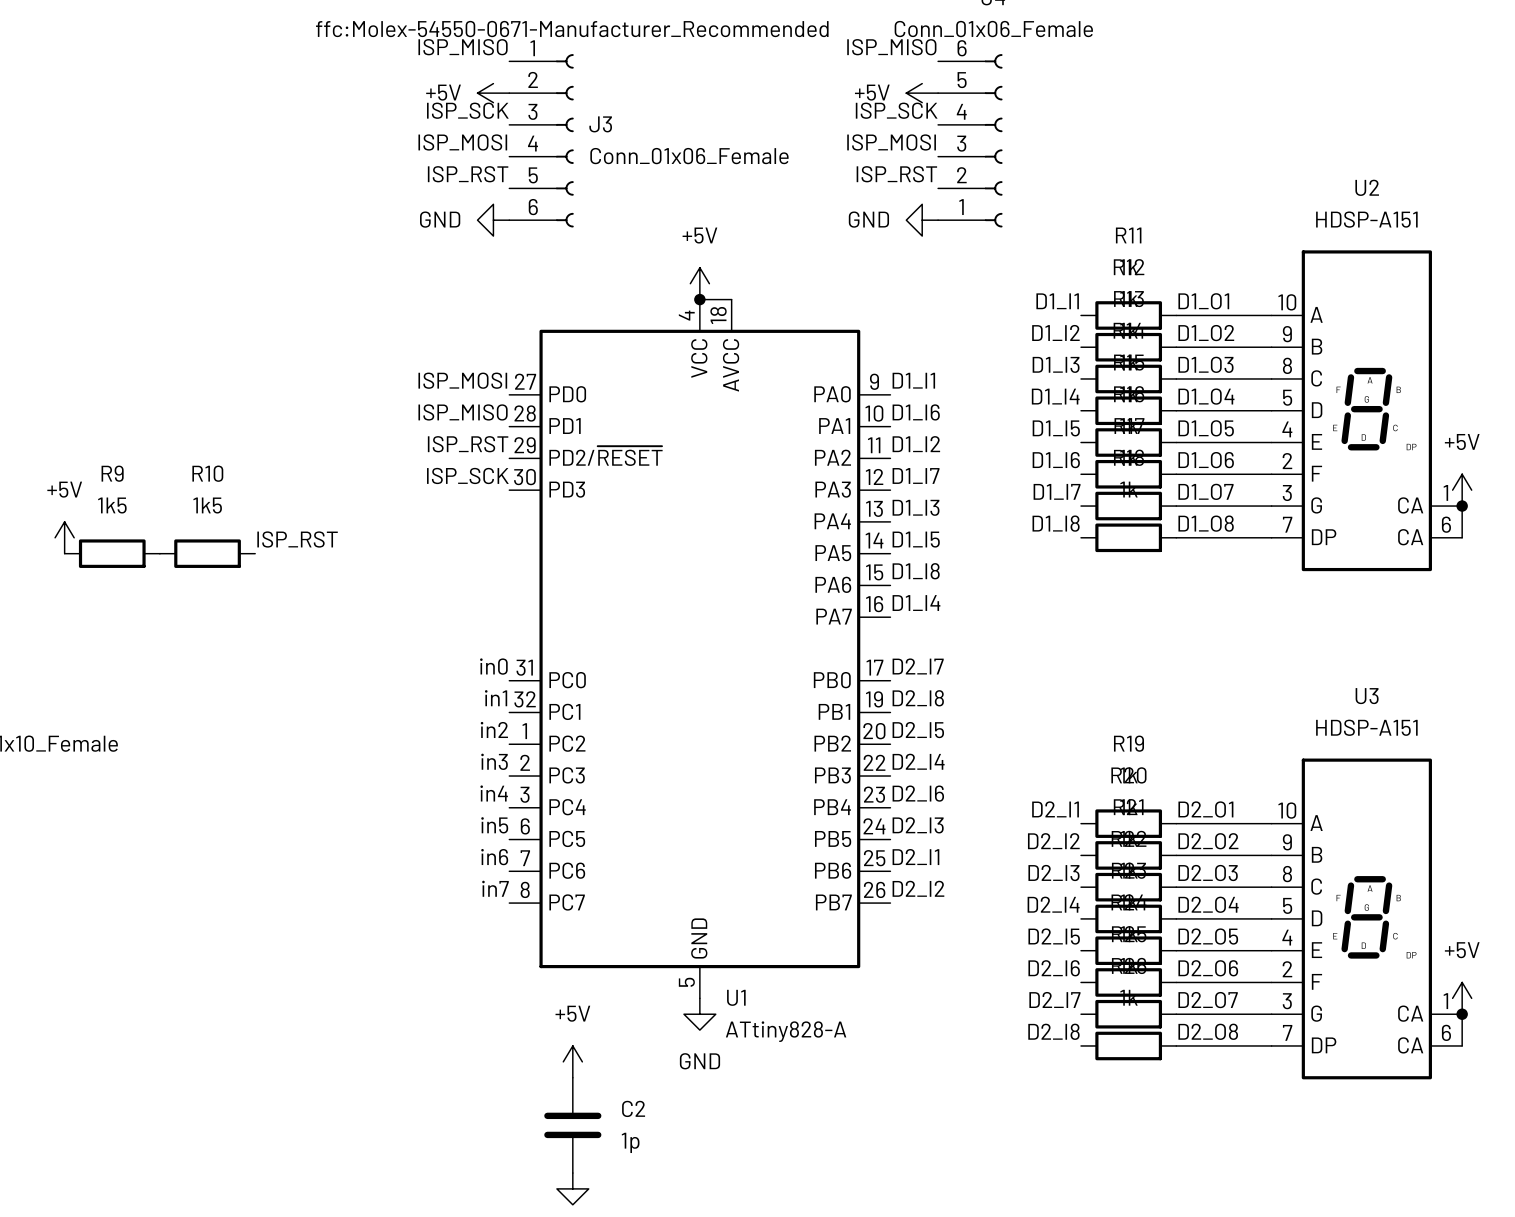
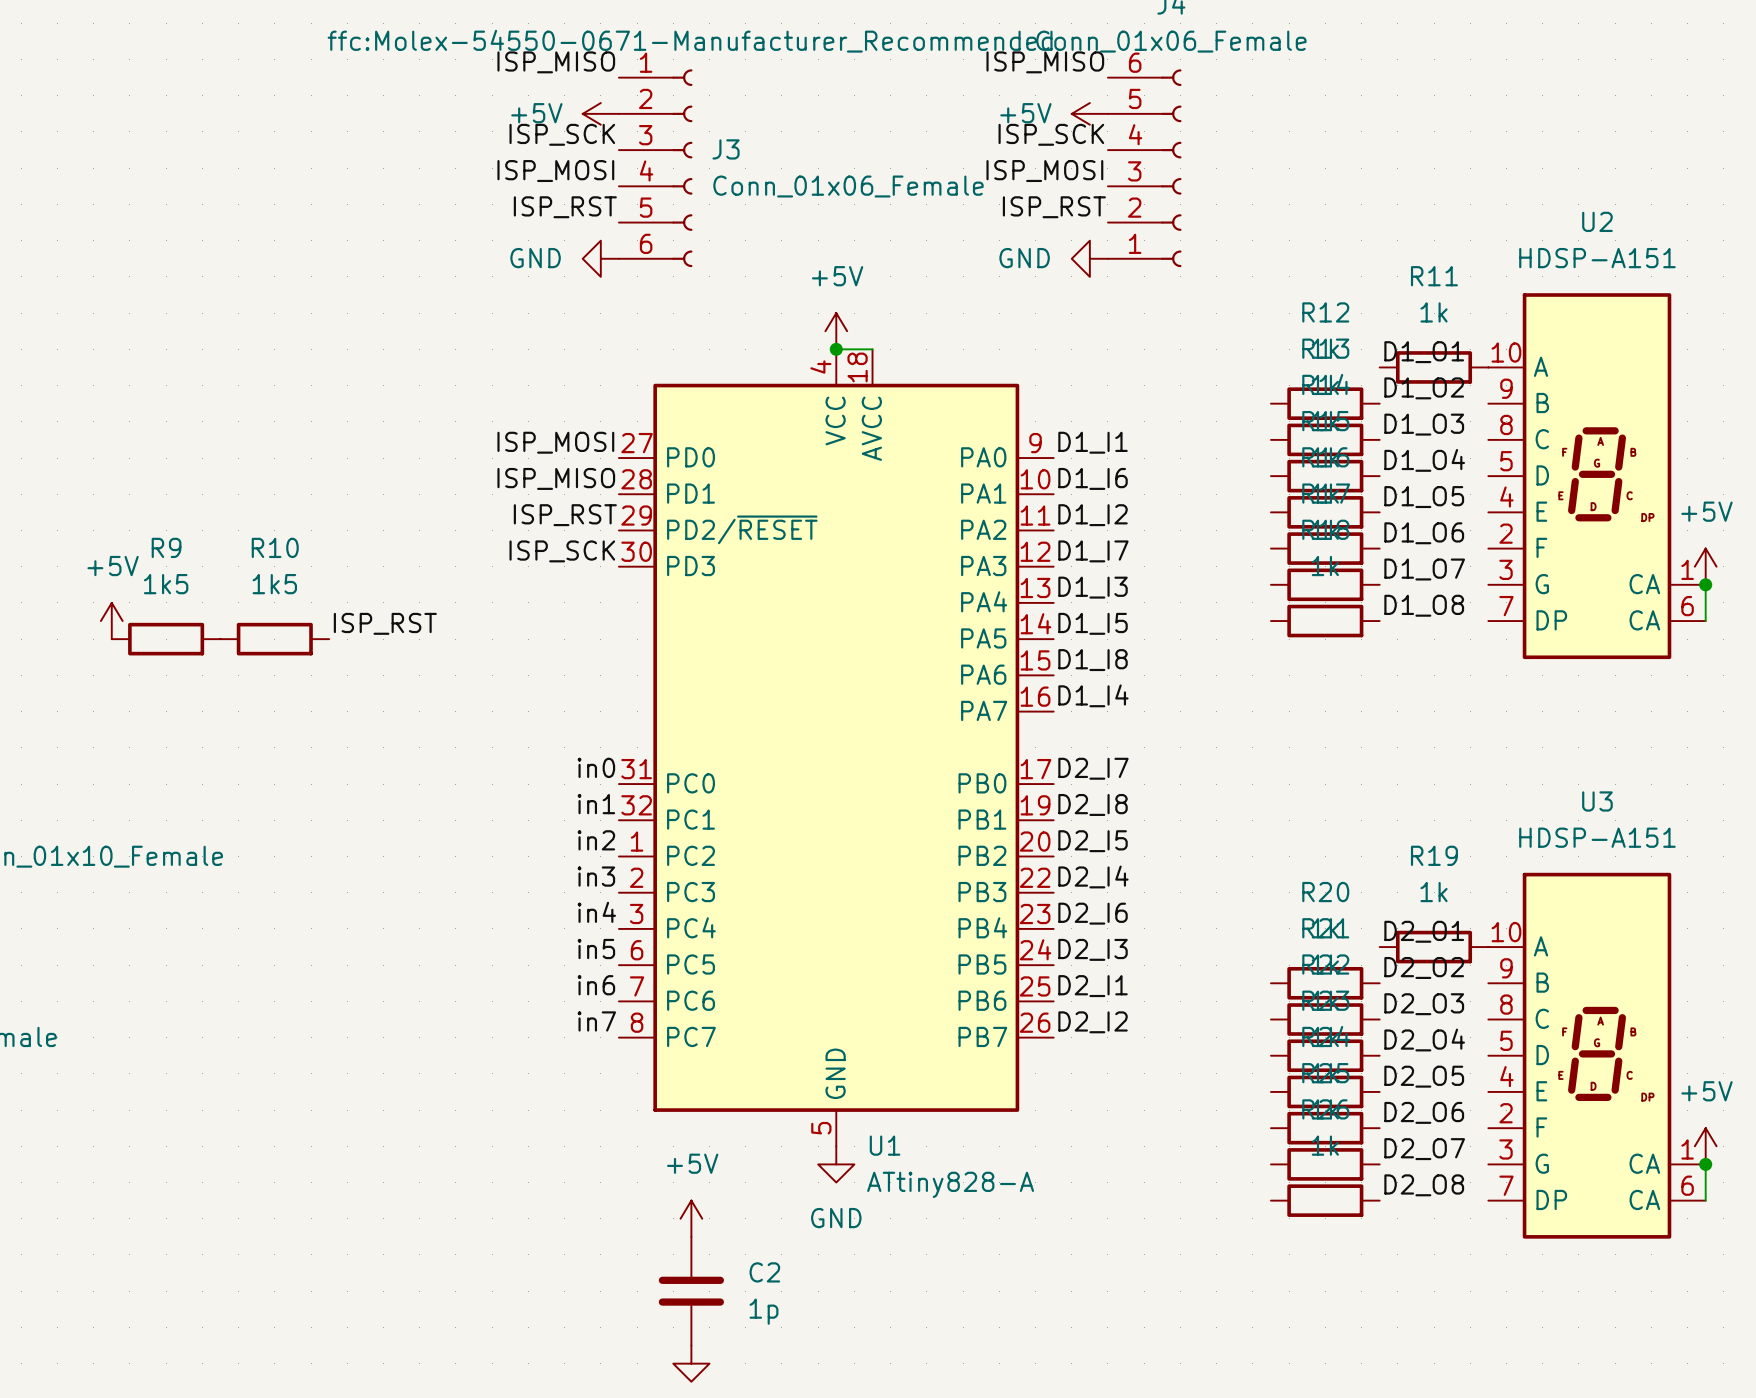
label: D1_I1 (1057, 301) -> none
R11 position: (1128, 315) -> (1434, 367)
wire: (1176, 315) (1271, 315) -> none
label: D1_I2 (1055, 332) -> none
wire: (1176, 347) (1271, 347) -> none
label: D1_I3 (1056, 364) -> none
wire: (1176, 378) (1271, 378) -> none
label: D1_I4 (1055, 396) -> none
wire: (1176, 410) (1271, 410) -> none
label: D1_I5 (1056, 428) -> none
wire: (1176, 442) (1271, 442) -> none
label: D1_I6 (1056, 460) -> none
wire: (1176, 474) (1271, 474) -> none
label: D1_I7 (1057, 491) -> none
wire: (1176, 506) (1271, 506) -> none
label: D1_I8 (1056, 523) -> none
wire: (1176, 537) (1271, 537) -> none
label: D2_I1 (1055, 809) -> none
R19 position: (1128, 823) -> (1434, 947)
wire: (1176, 823) (1271, 823) -> none
label: D2_I2 (1053, 841) -> none
wire: (1176, 855) (1271, 855) -> none
label: D2_I3 (1053, 873) -> none
wire: (1176, 887) (1271, 887) -> none
label: D2_I4 (1053, 904) -> none
wire: (1176, 918) (1271, 918) -> none
label: D2_I5 (1054, 936) -> none
wire: (1176, 950) (1271, 950) -> none
label: D2_I6 (1054, 968) -> none
wire: (1176, 982) (1271, 982) -> none
label: D2_I7 (1054, 999) -> none
wire: (1176, 1014) (1271, 1014) -> none
label: D2_I8 (1053, 1031) -> none
wire: (1176, 1045) (1271, 1045) -> none

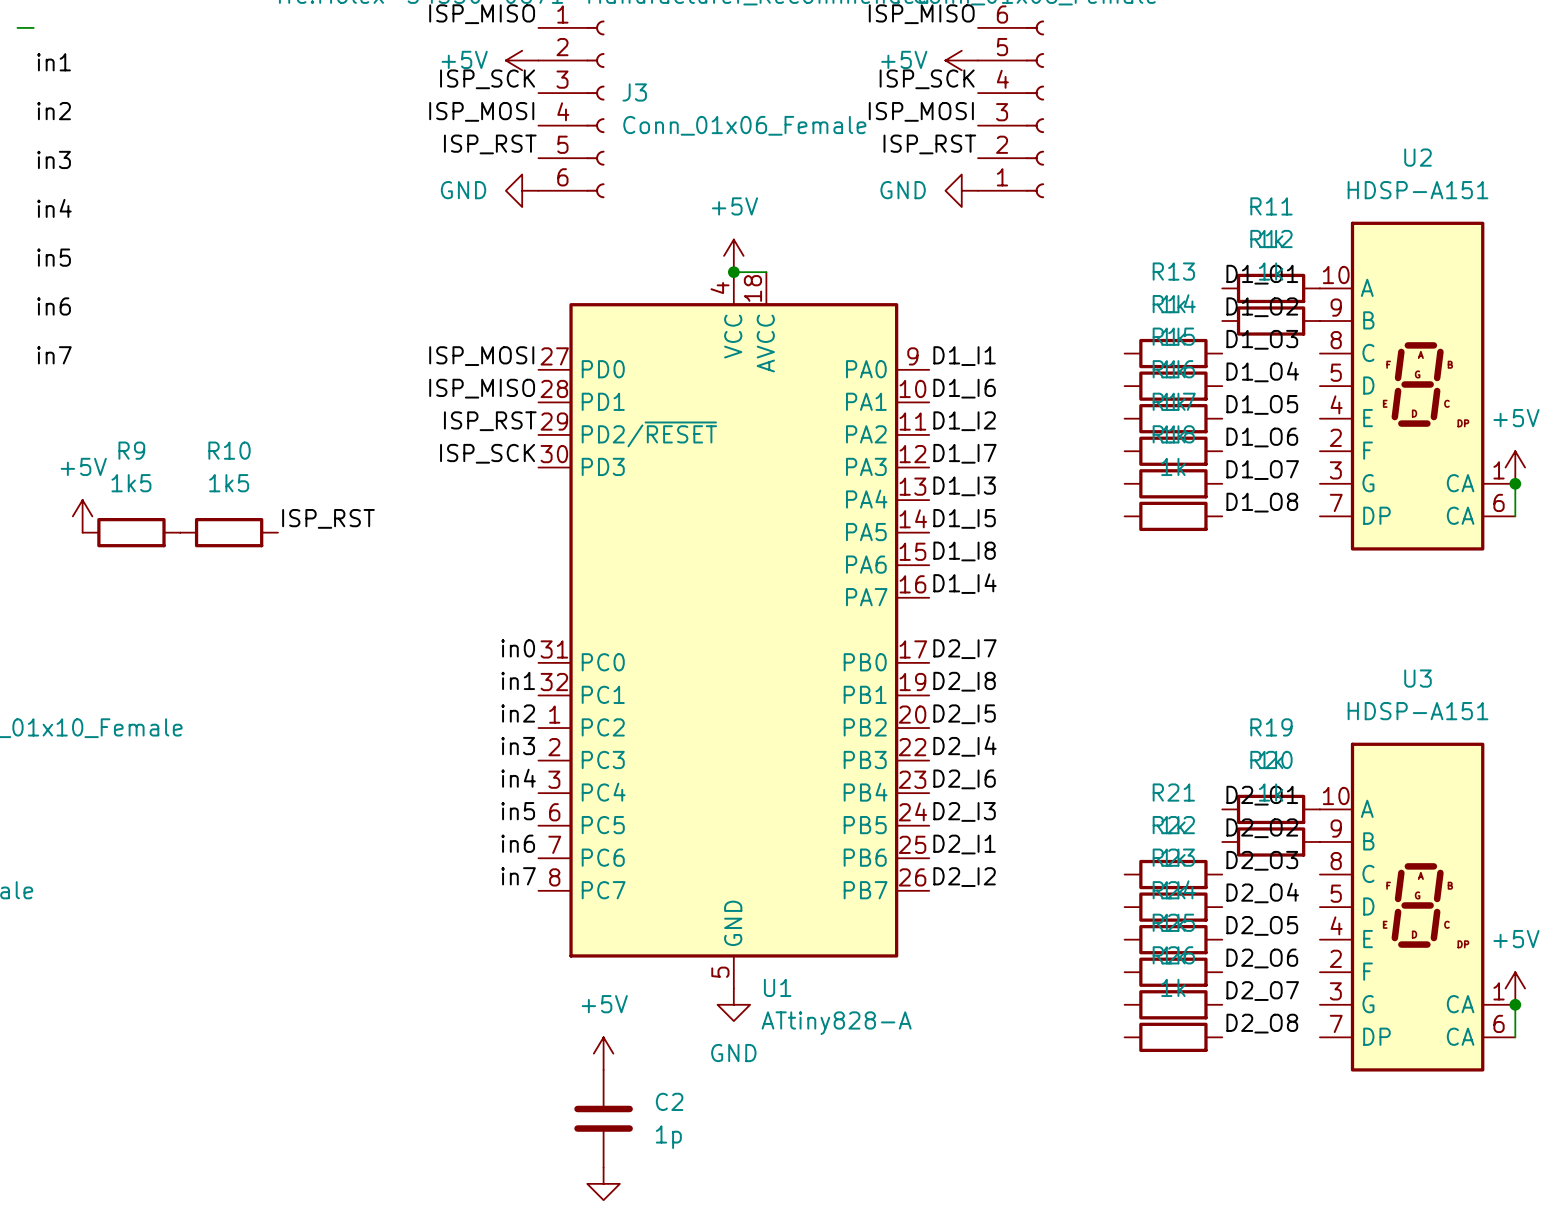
wire: none -> (17, 27) (33, 27)
label: none -> in1 (54, 62)
label: none -> in2 (54, 111)
label: none -> in3 (54, 159)
label: none -> in4 (54, 208)
label: none -> in5 (54, 257)
label: none -> in6 (54, 306)
R12 position: (1325, 403) -> (1271, 321)
label: none -> in7 (54, 355)
R20 position: (1325, 983) -> (1271, 841)

